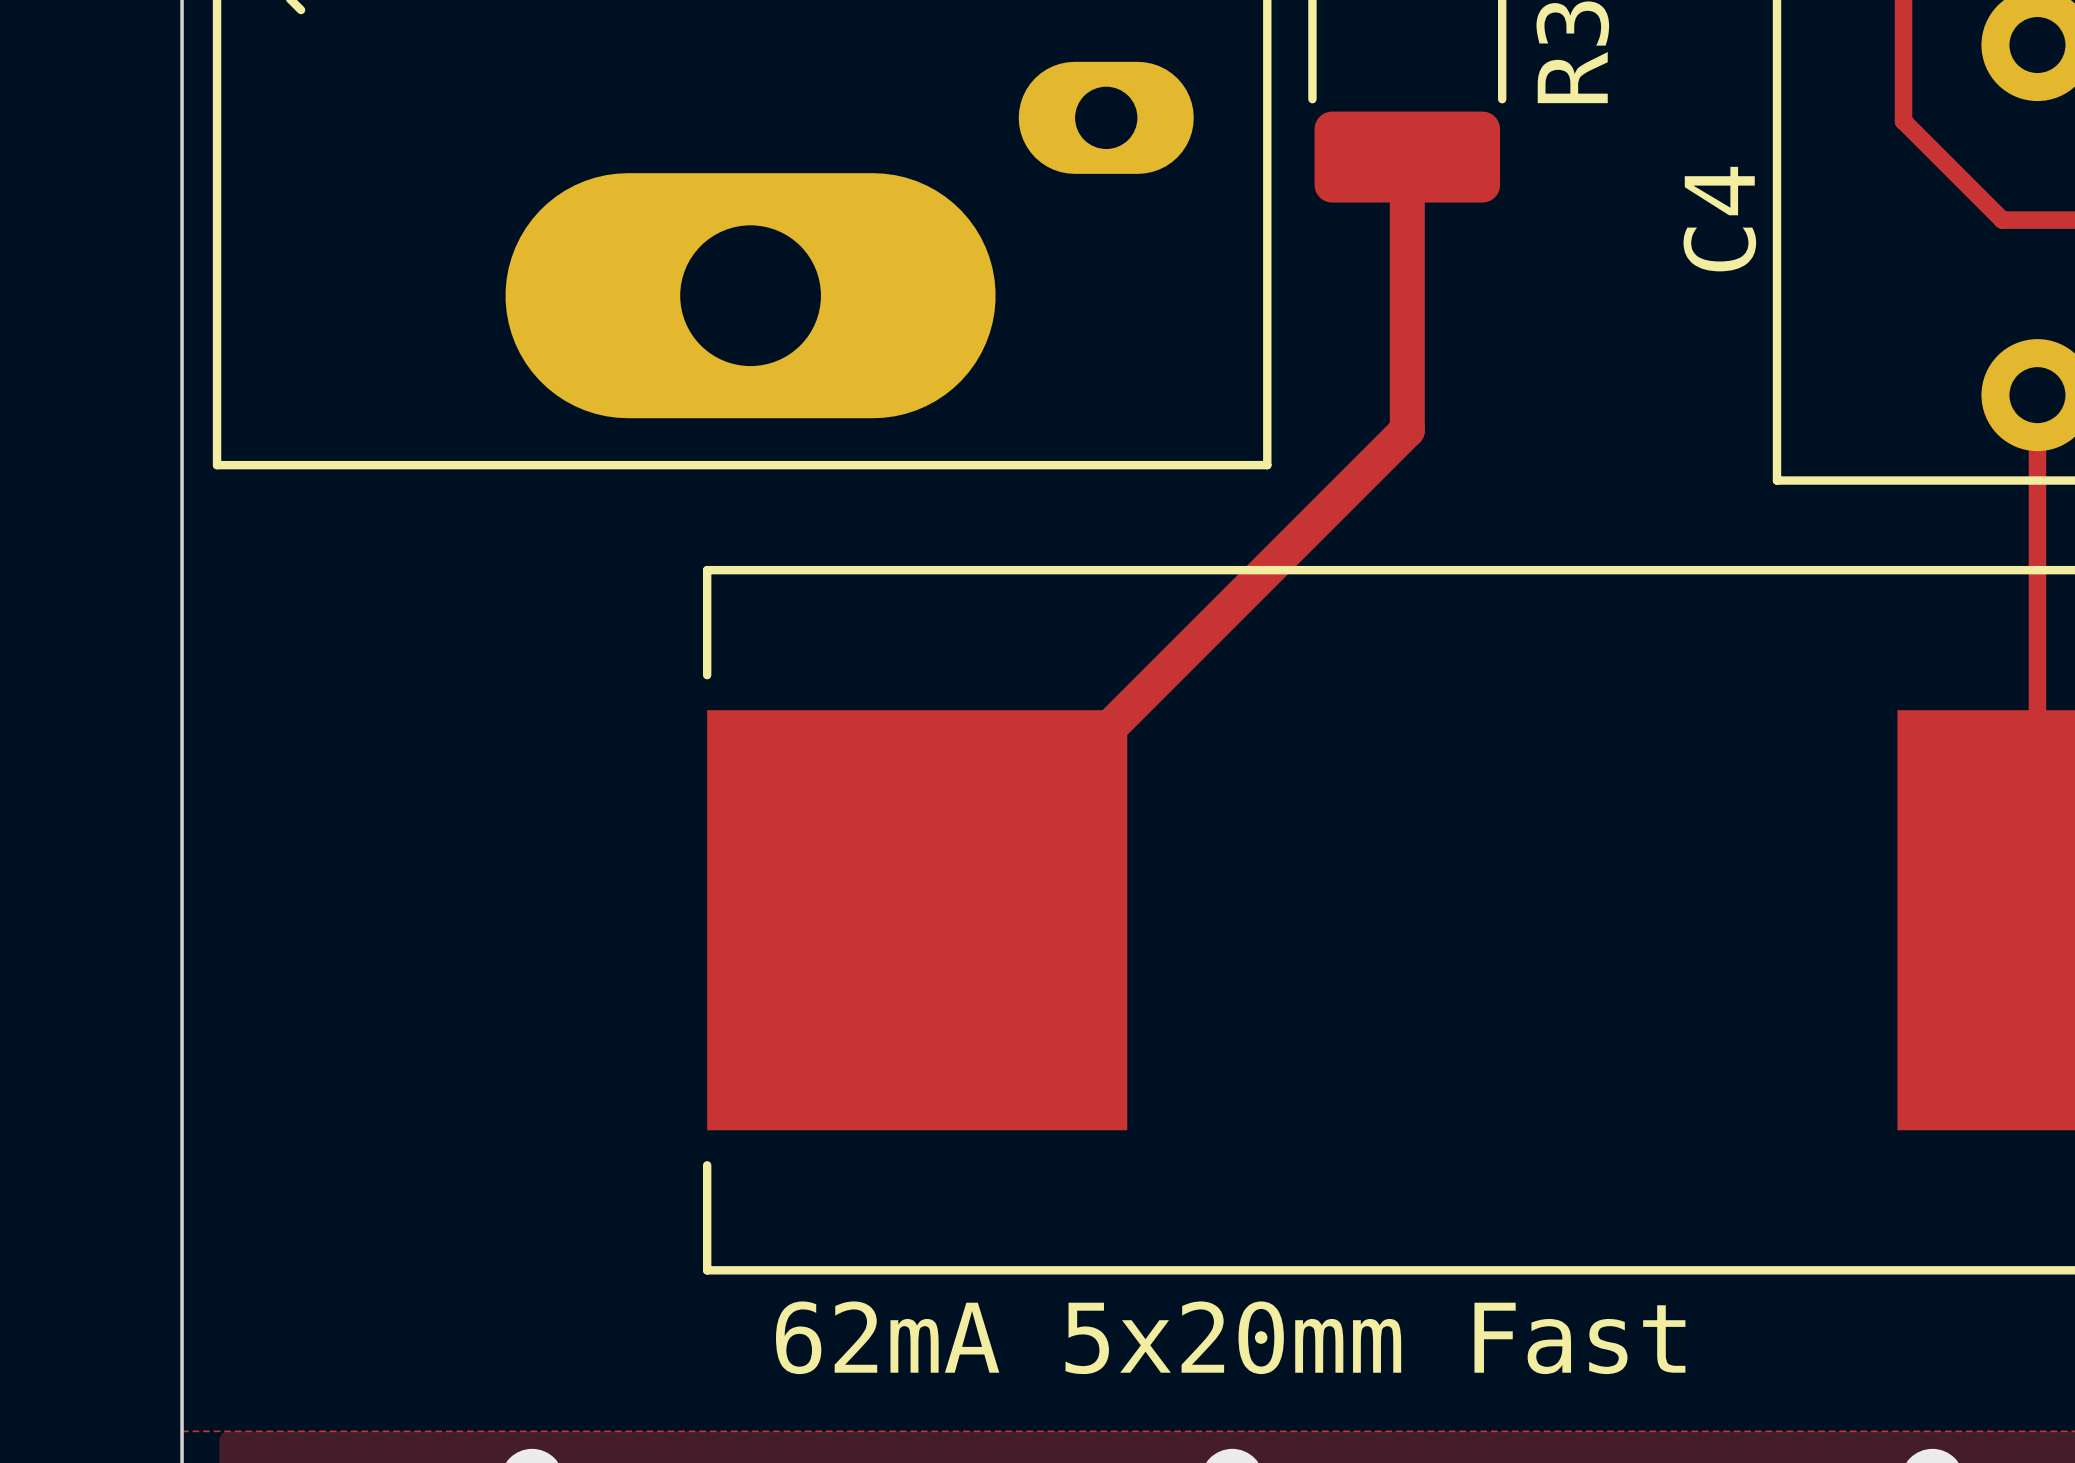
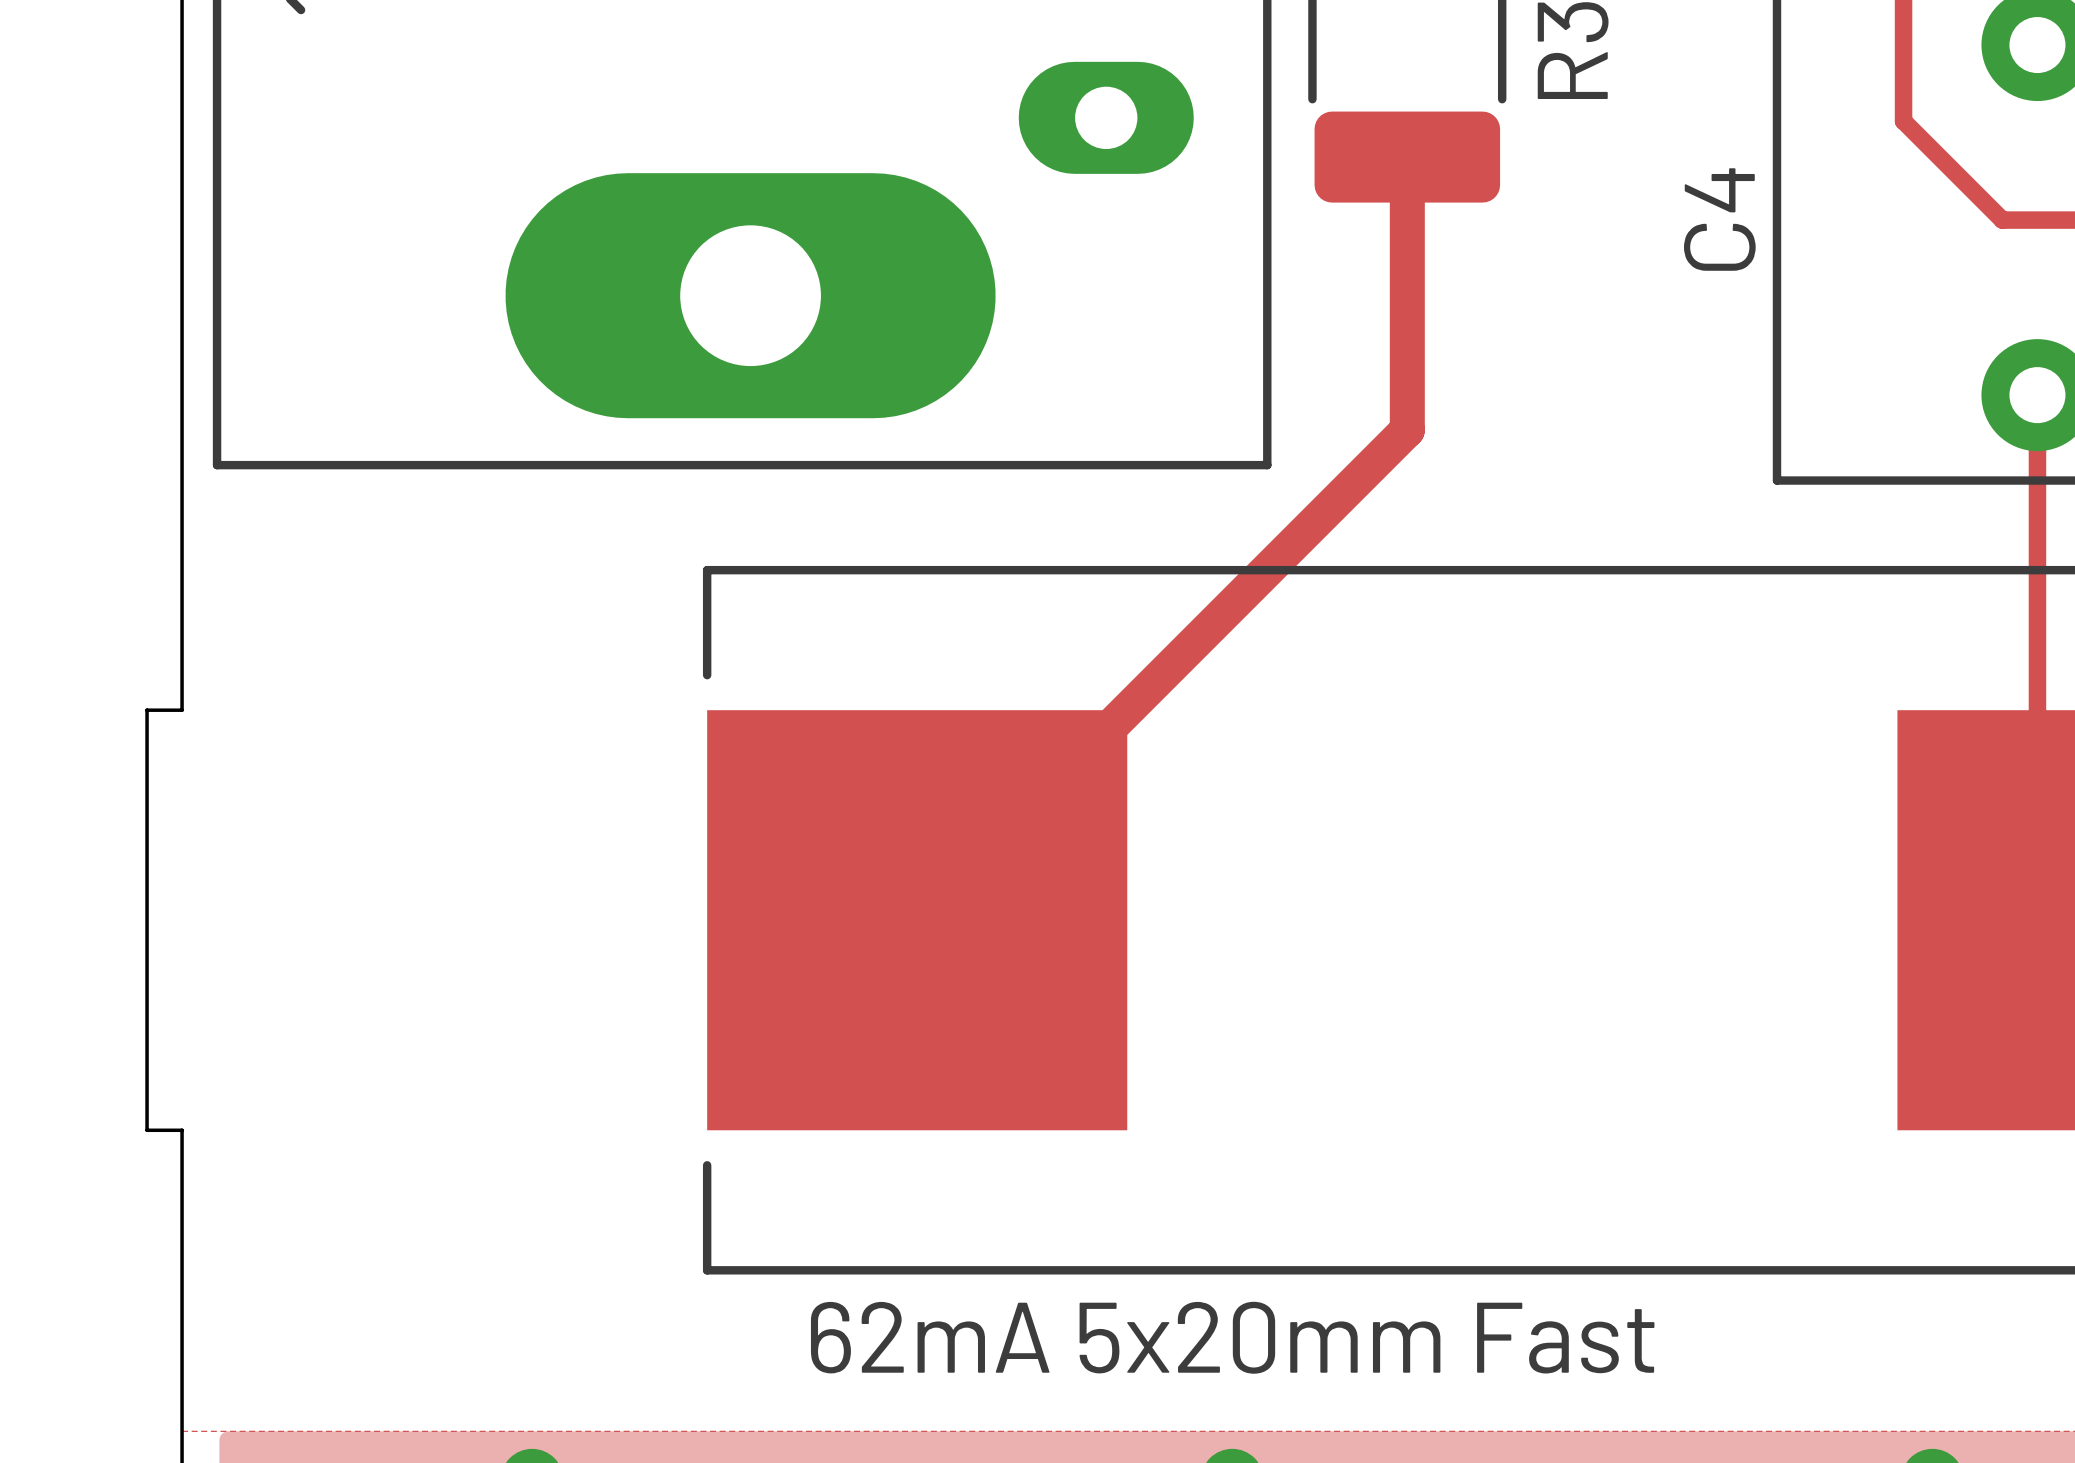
board edge: (182, 710) (182, 1130) -> (182, 710) (147, 710) (147, 1130) (182, 1130)

